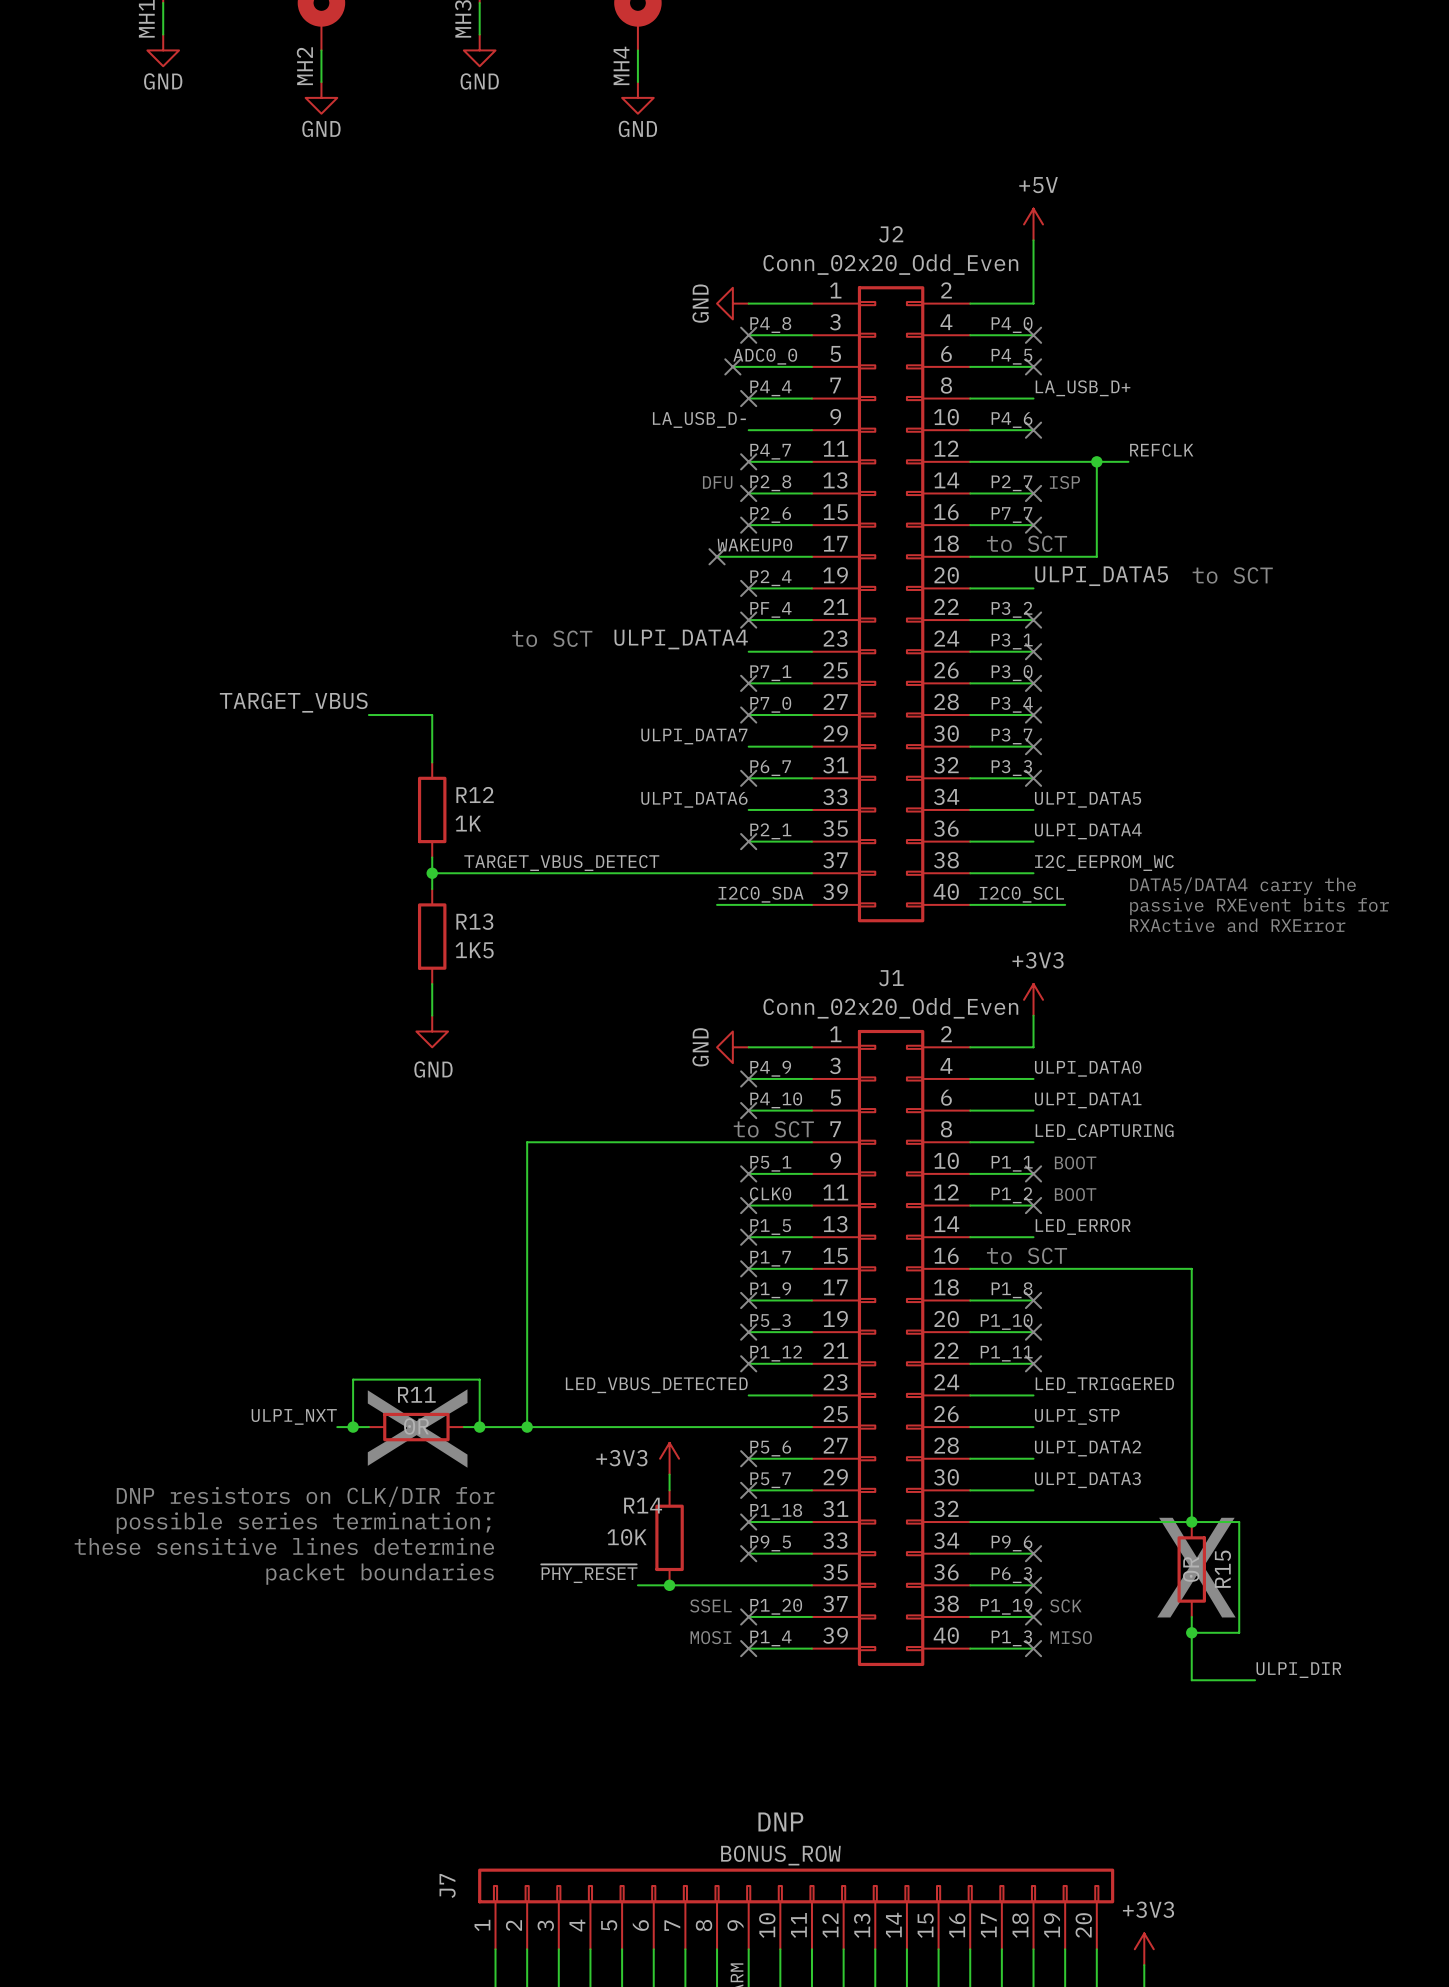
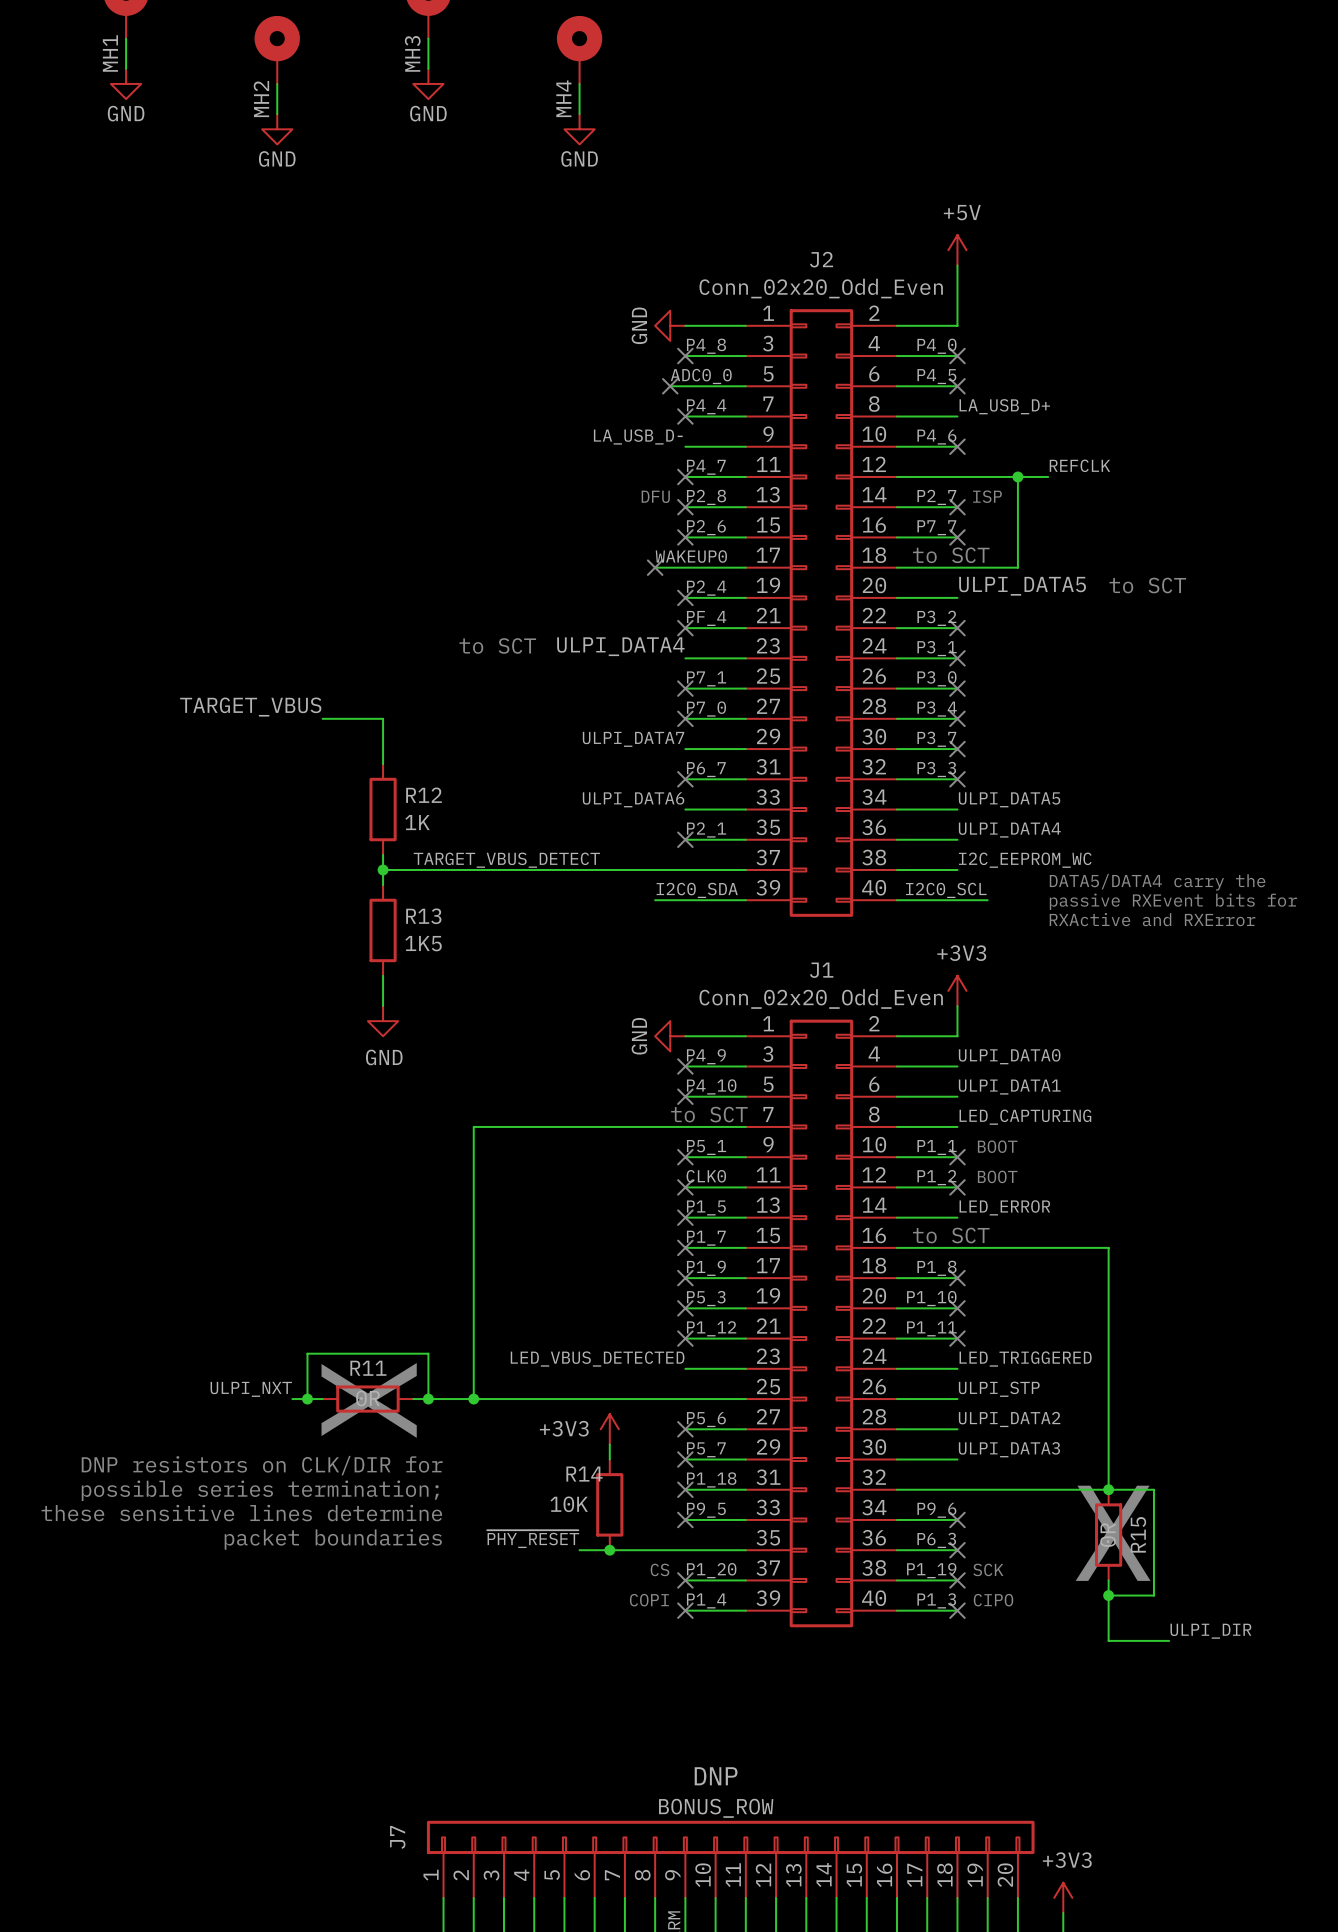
text: SSEL (710, 1605) -> CS (659, 1569)
text: MOSI (710, 1637) -> COPI (649, 1600)
text: MISO (1071, 1637) -> CIPO (993, 1600)

